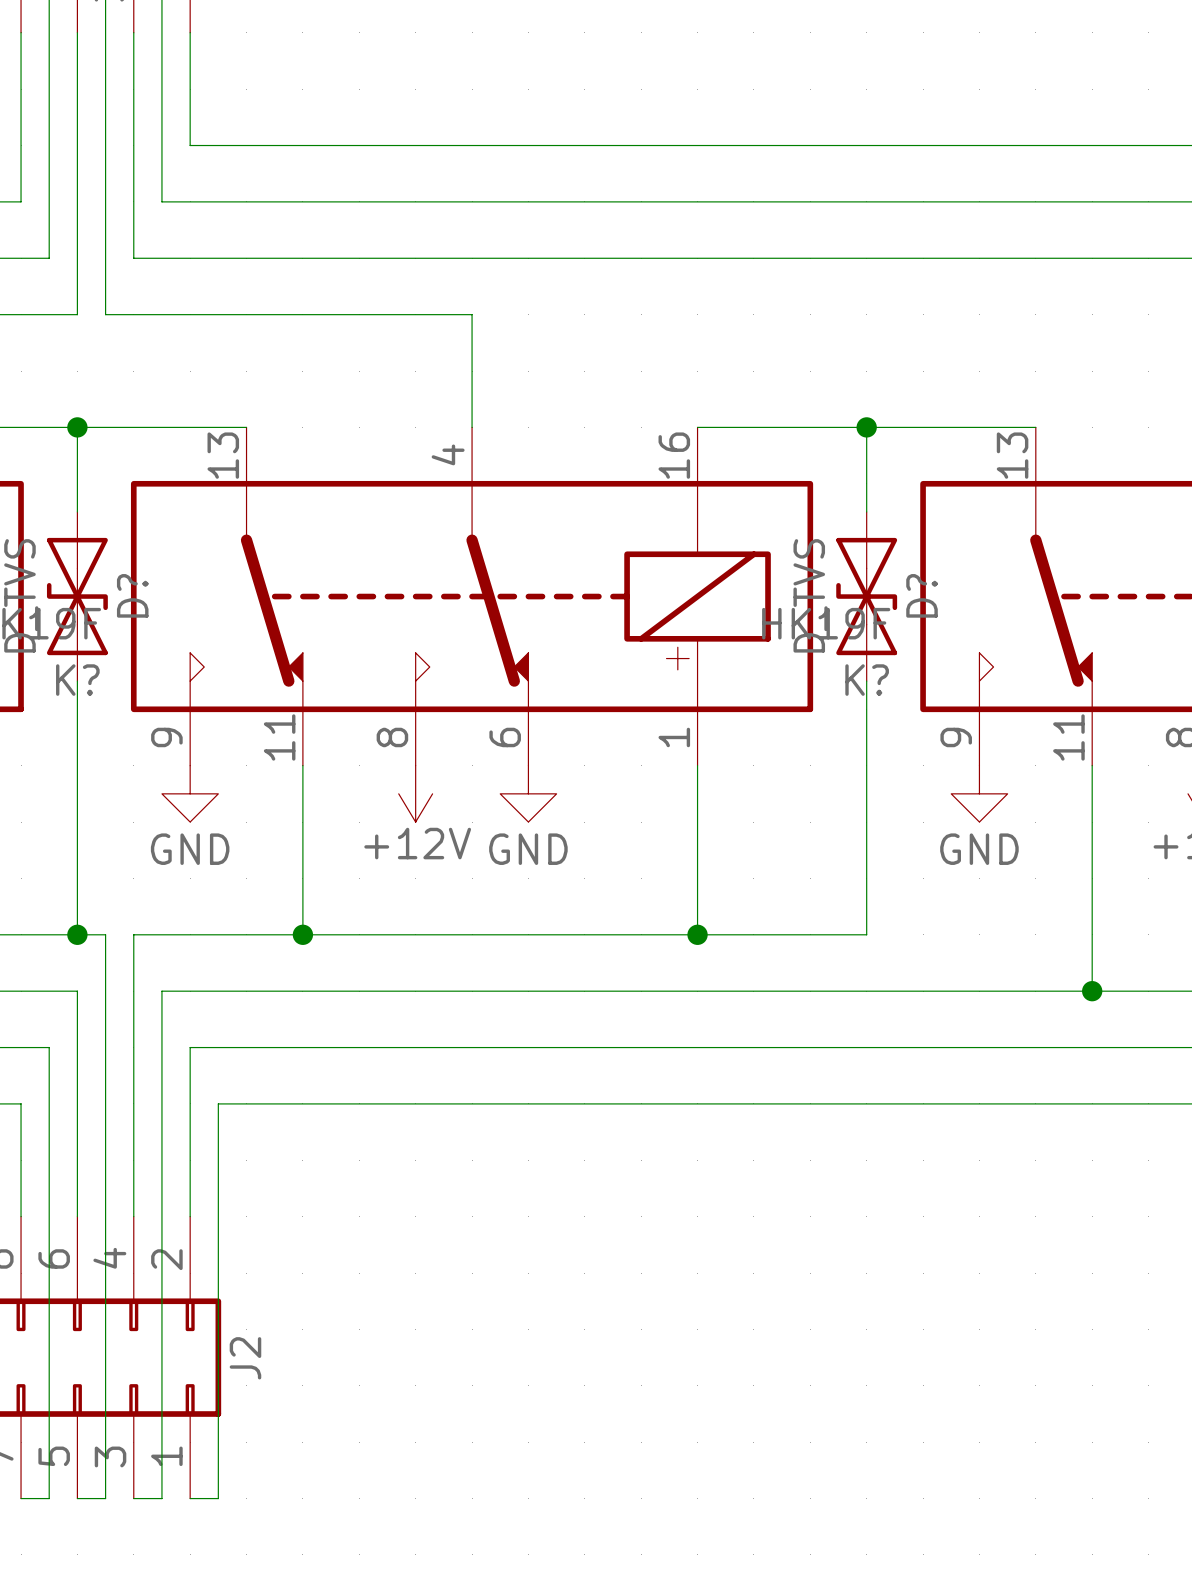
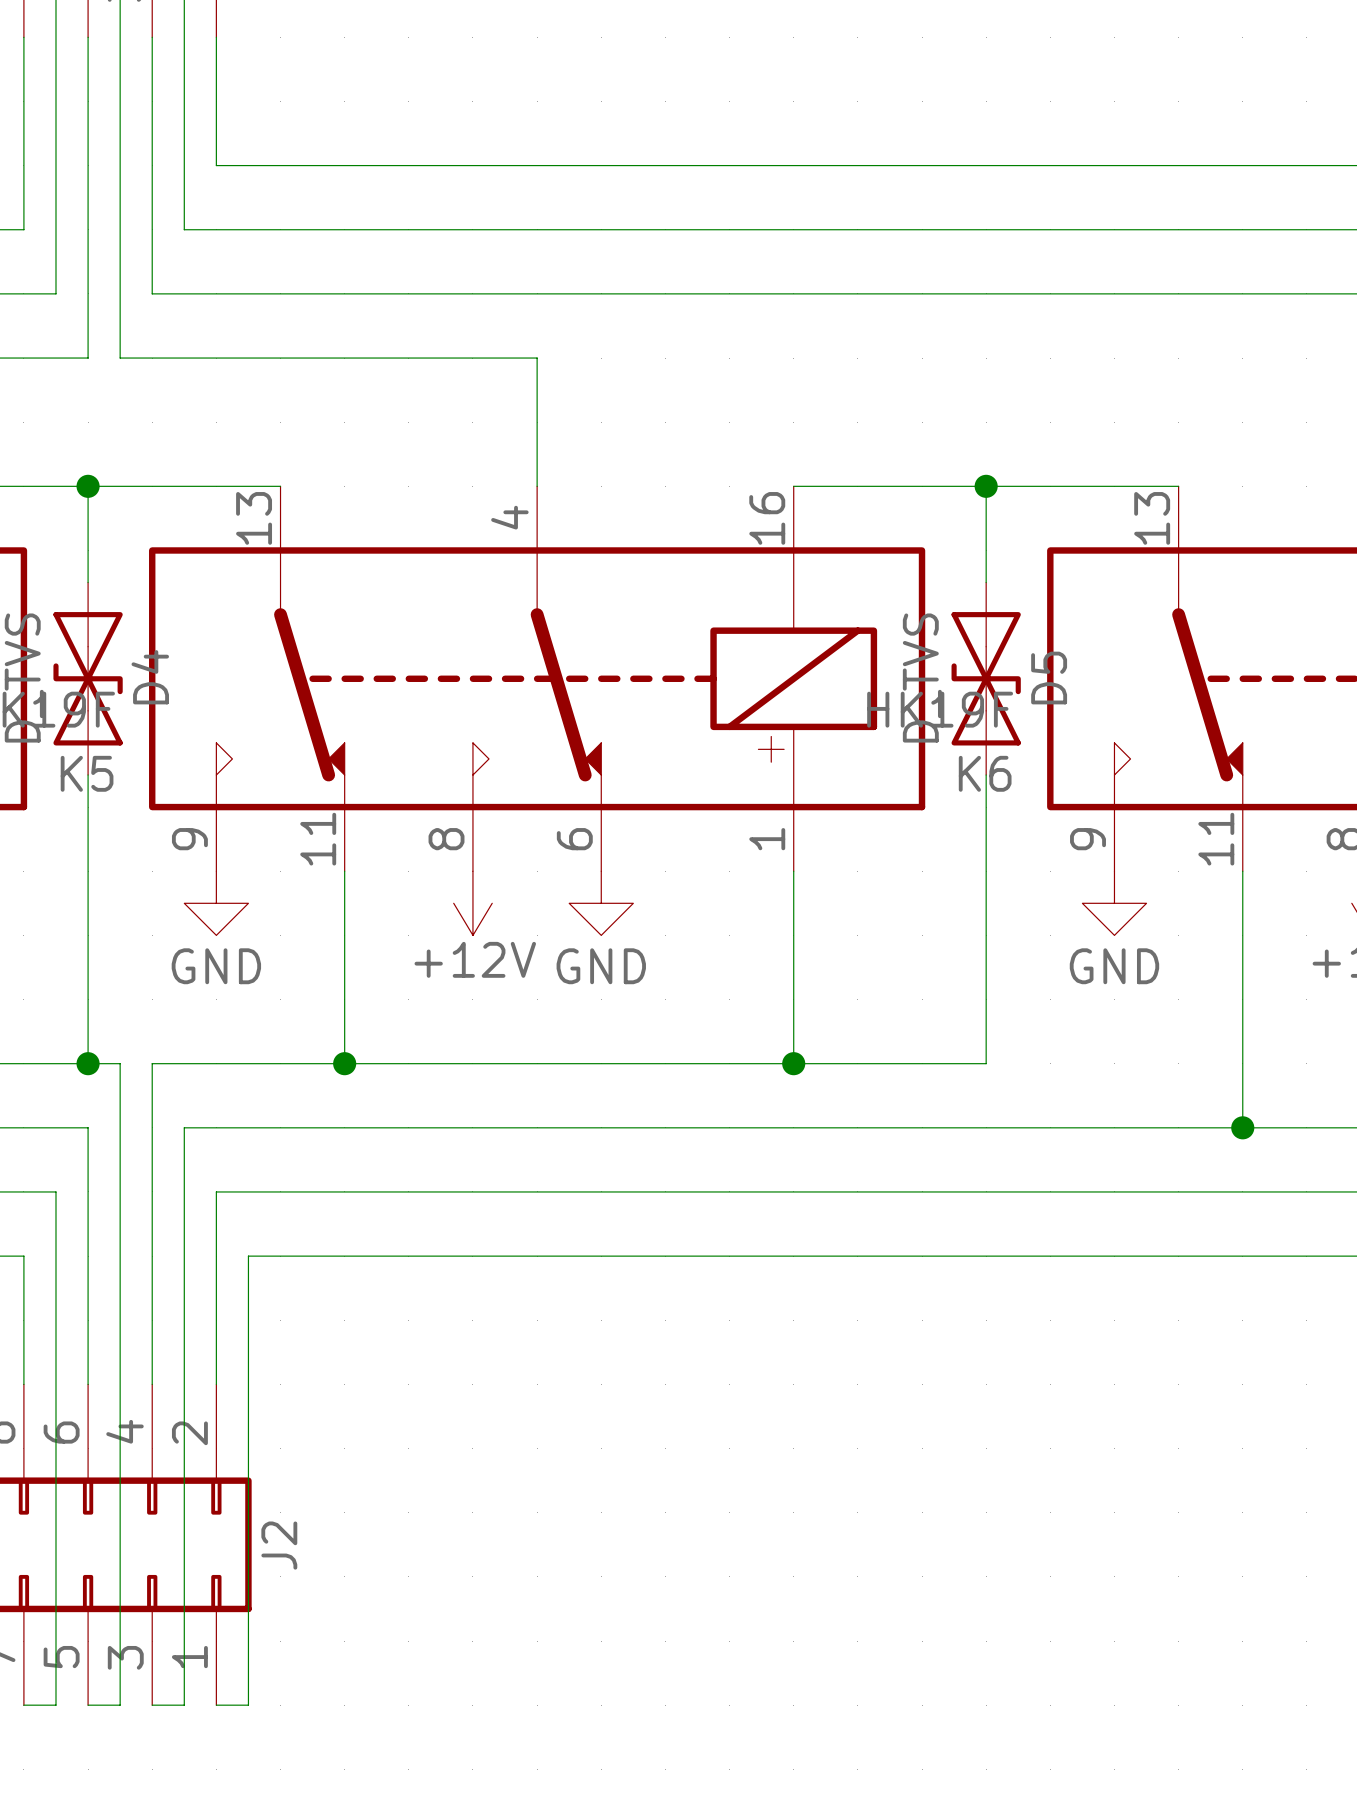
D? name: D? (132, 595) -> D4 (150, 677)
D? name: D? (922, 595) -> D5 (1049, 678)
K? name: K? (77, 680) -> K5 (87, 773)
K? name: K? (867, 680) -> K6 (985, 773)

